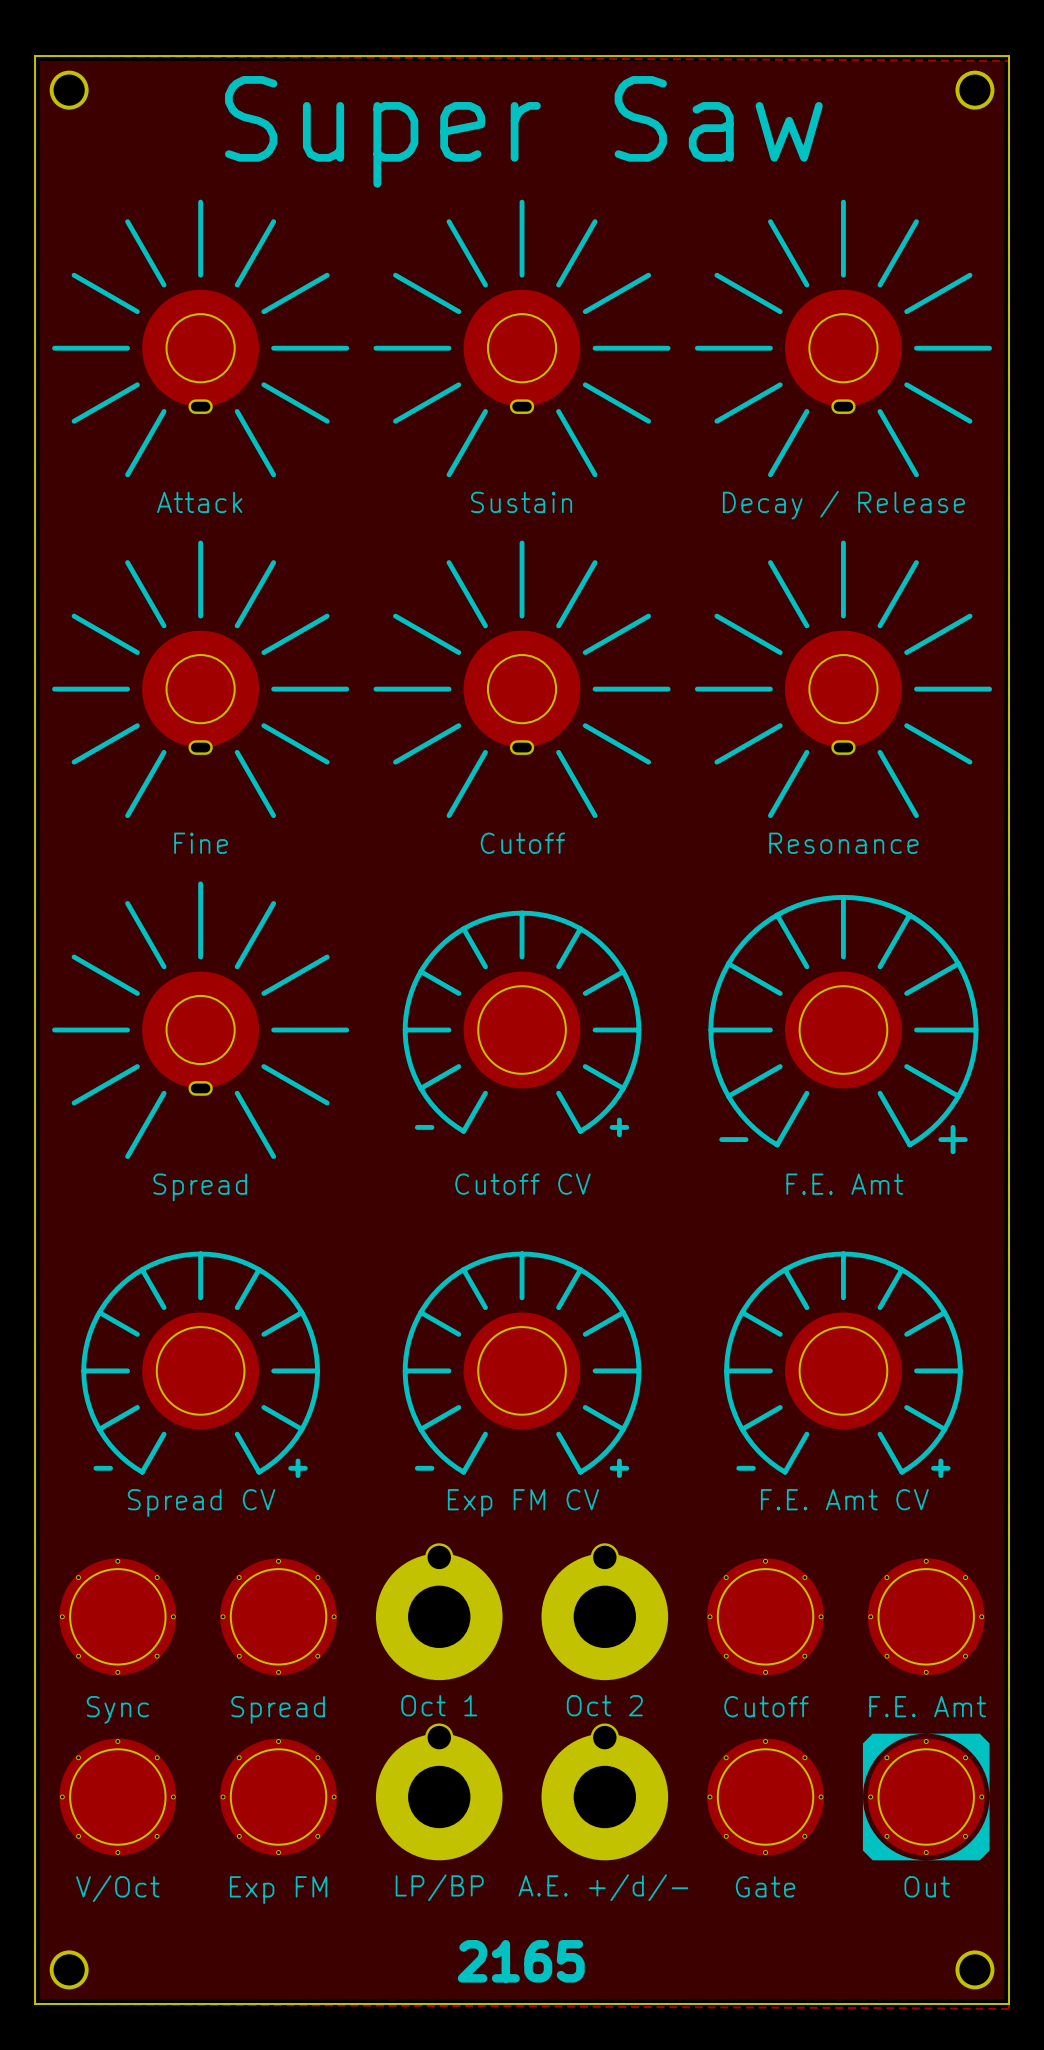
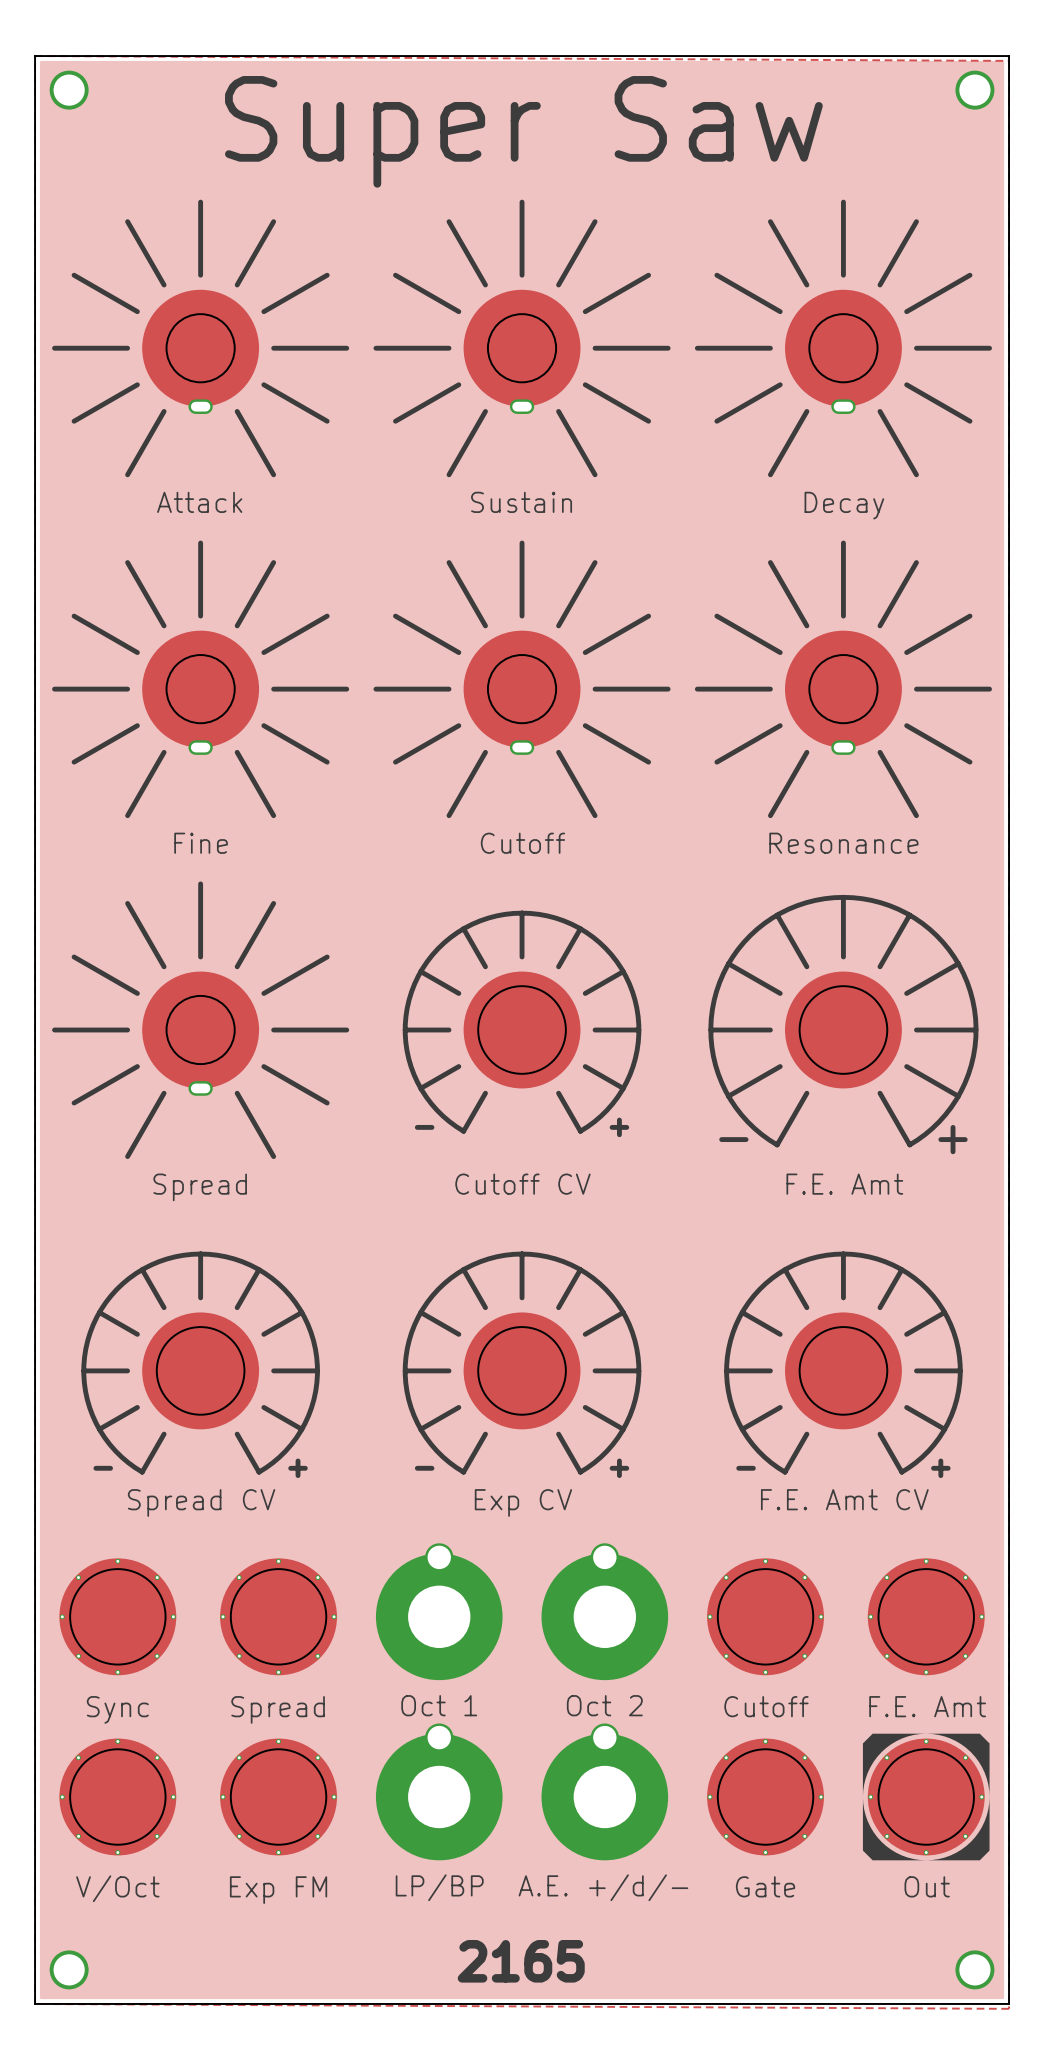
part value: Decay / Release (843, 505) -> Decay (844, 505)
part value: Exp FM CV (523, 1502) -> Exp CV (523, 1502)

